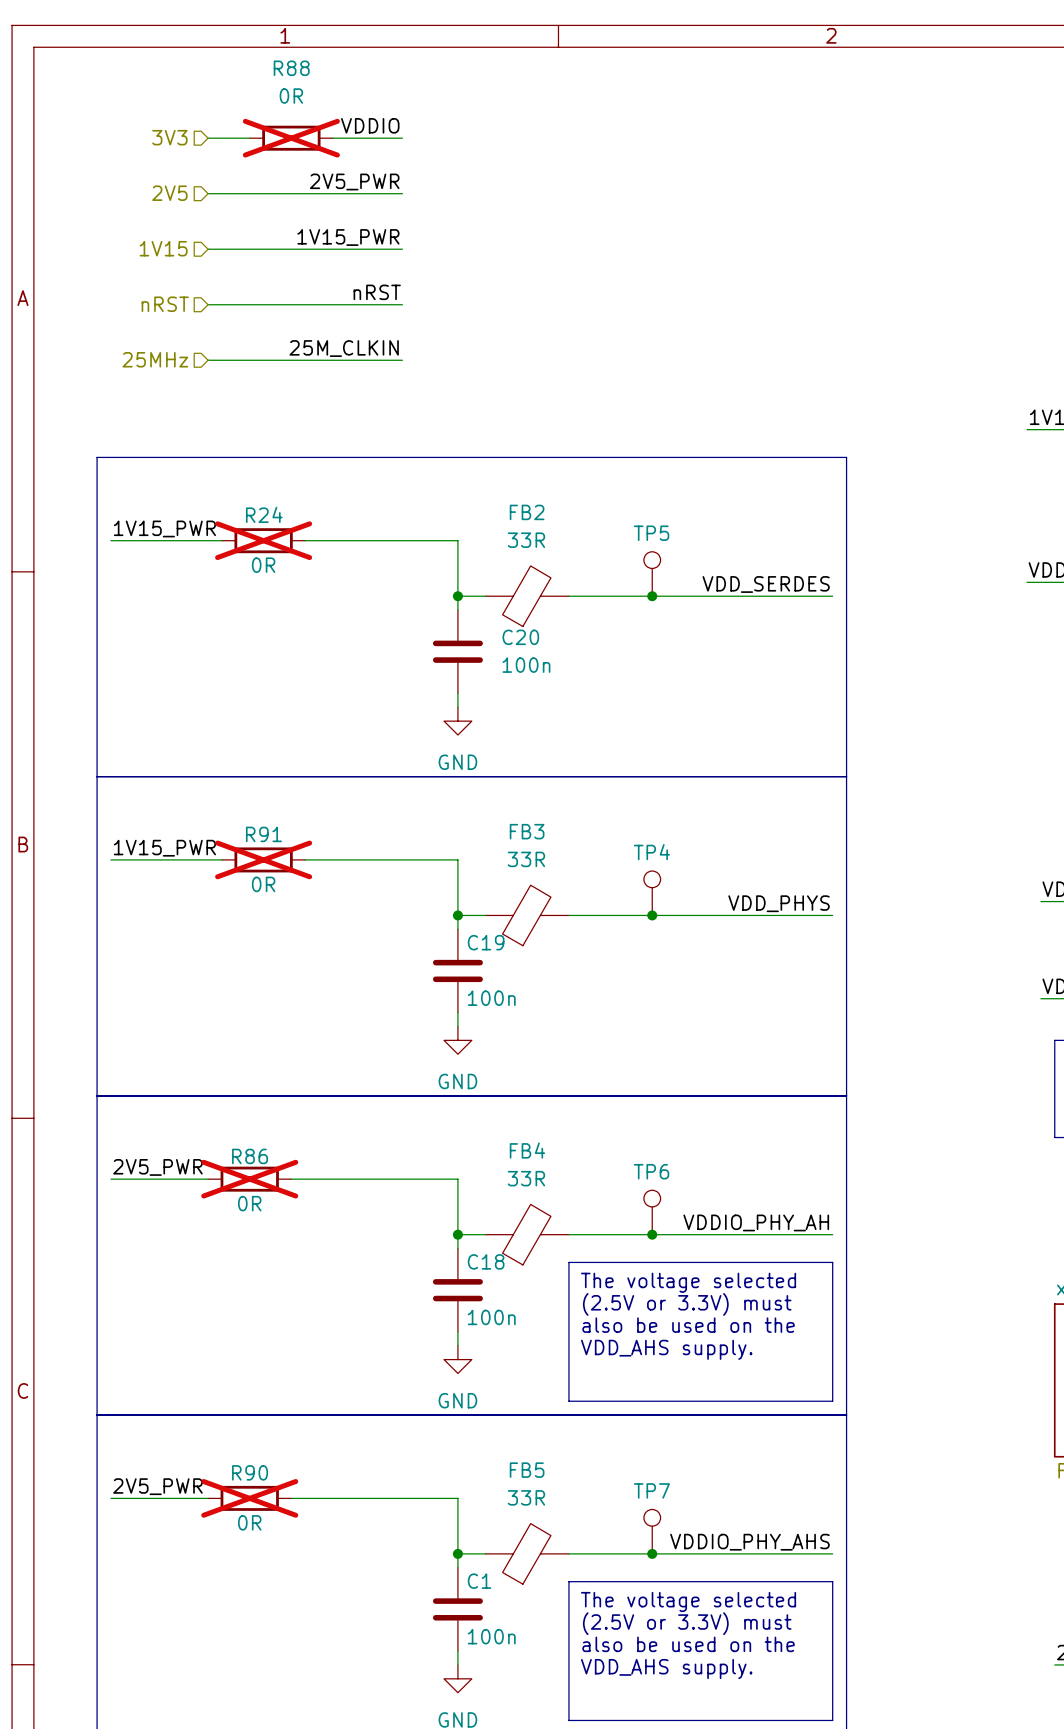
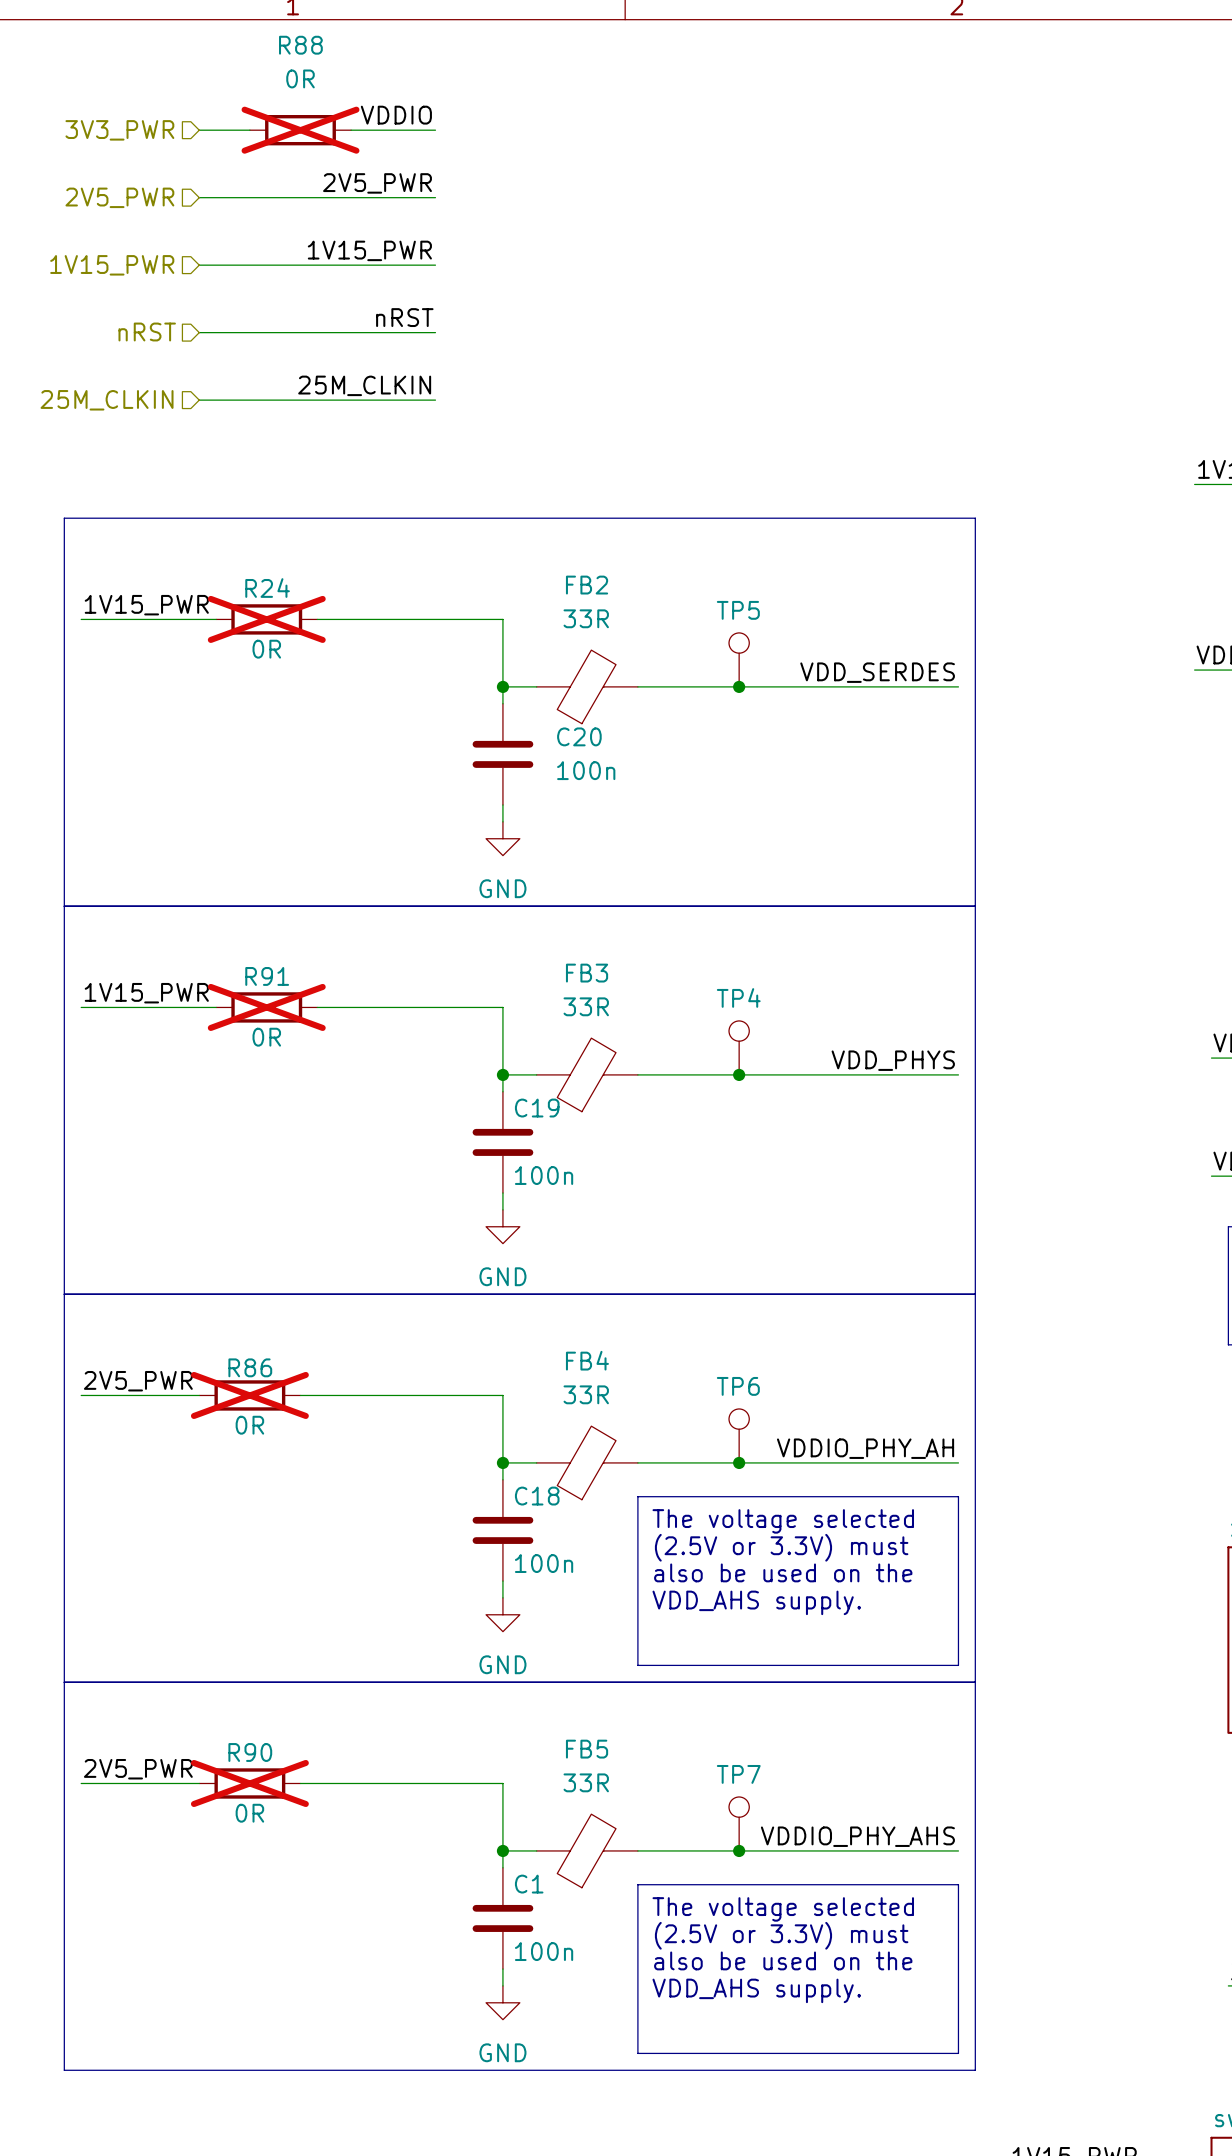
hierarchical label: 3V3 (169, 137) -> 3V3_PWR (119, 130)
hierarchical label: 2V5 (169, 193) -> 2V5_PWR (119, 197)
hierarchical label: 1V15 (163, 248) -> 1V15_PWR (112, 265)
hierarchical label: 25MHz (155, 359) -> 25M_CLKIN (107, 400)

